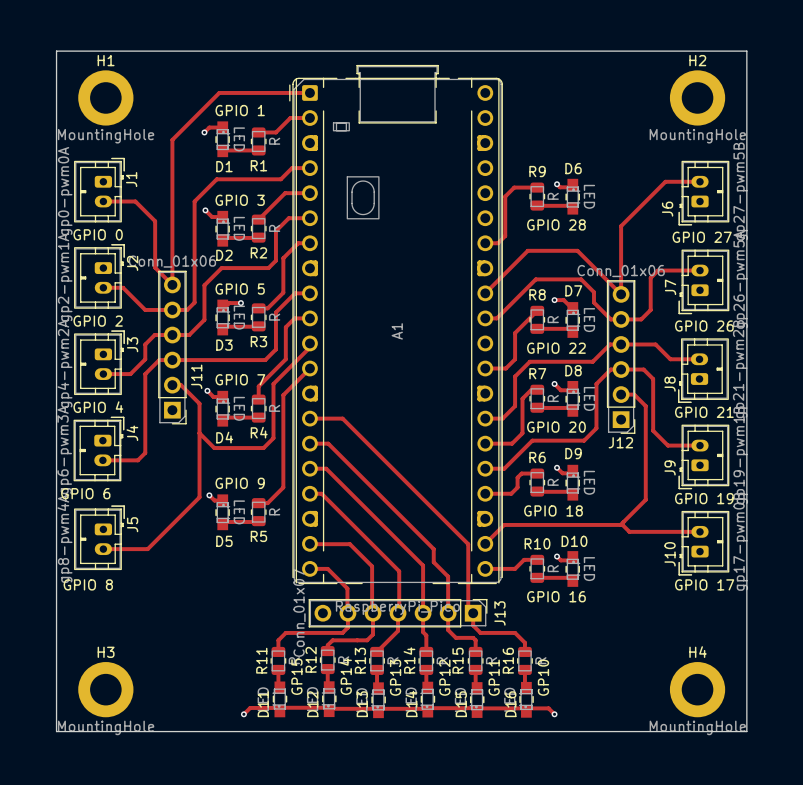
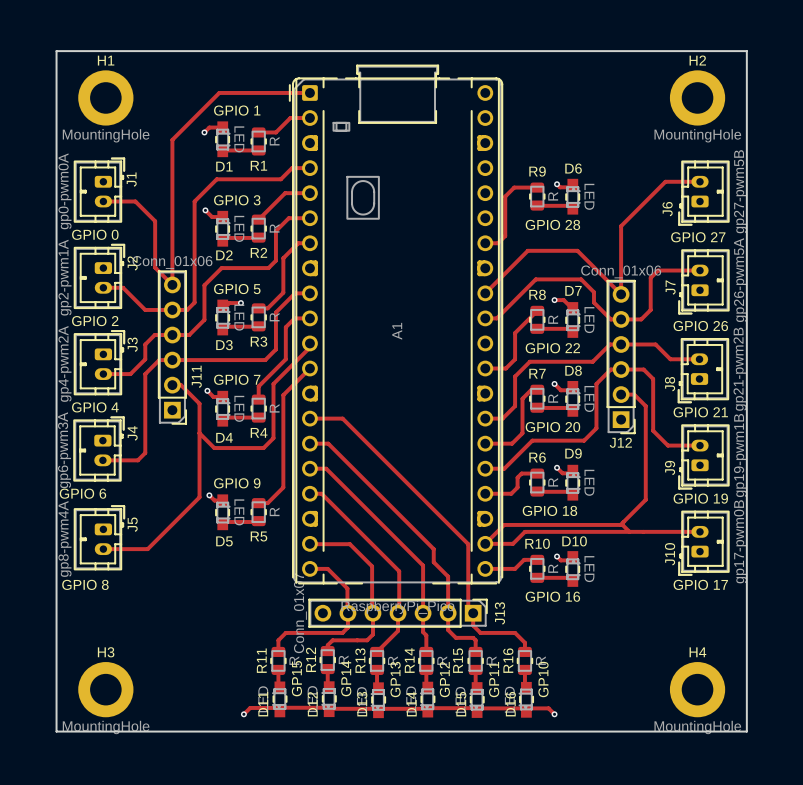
track: none -> (629, 531) (524, 531) (512, 543) (485, 543)

